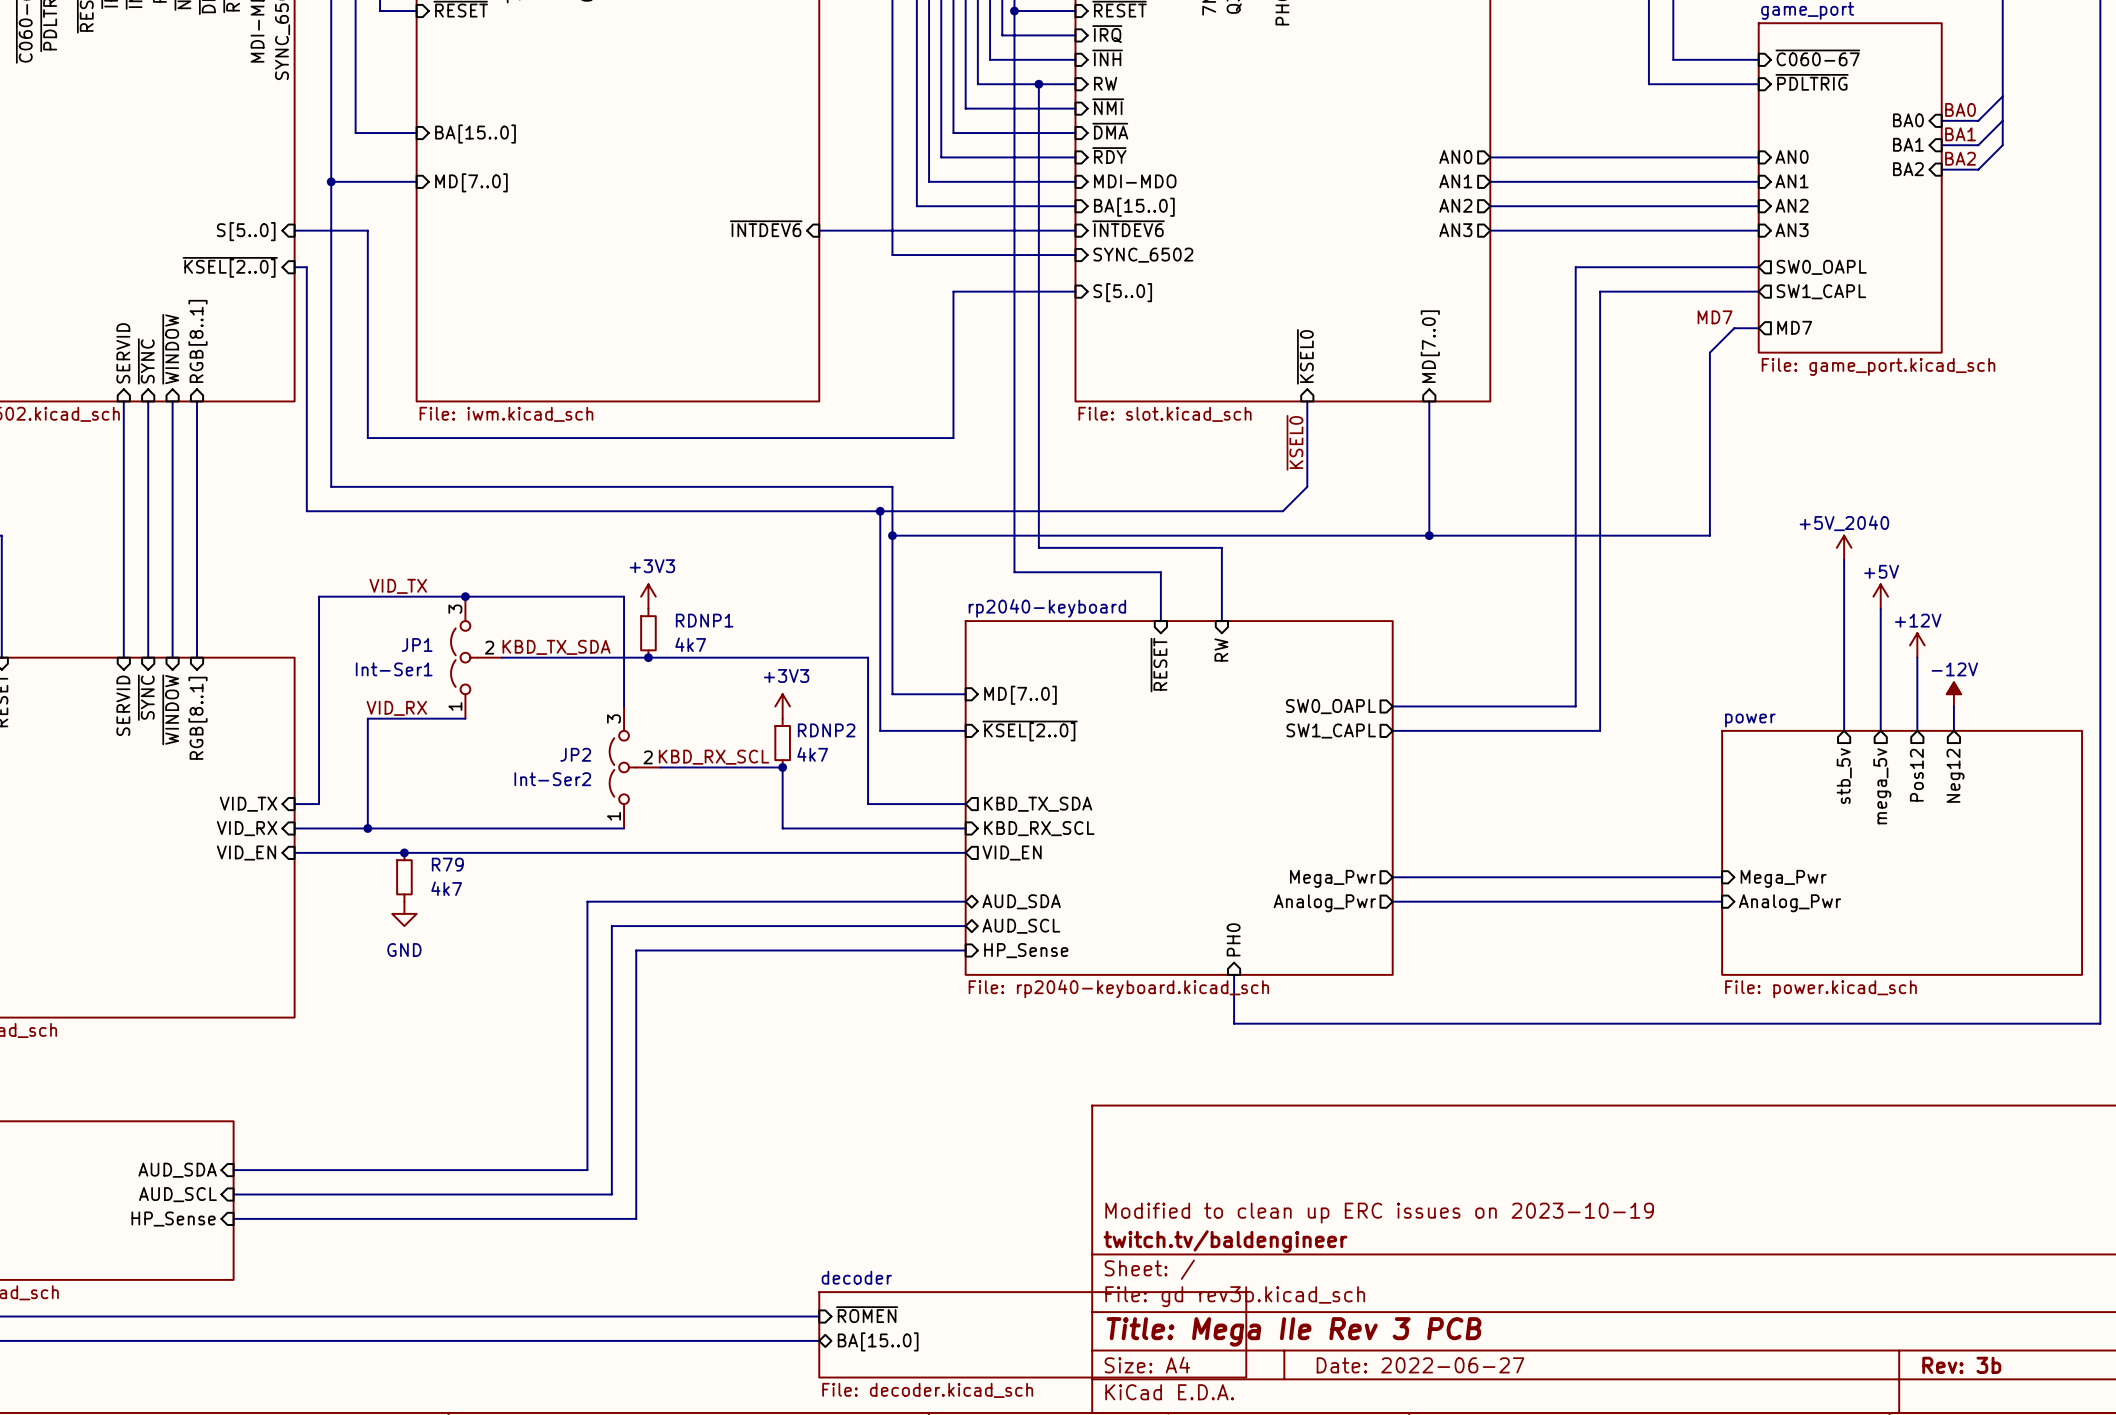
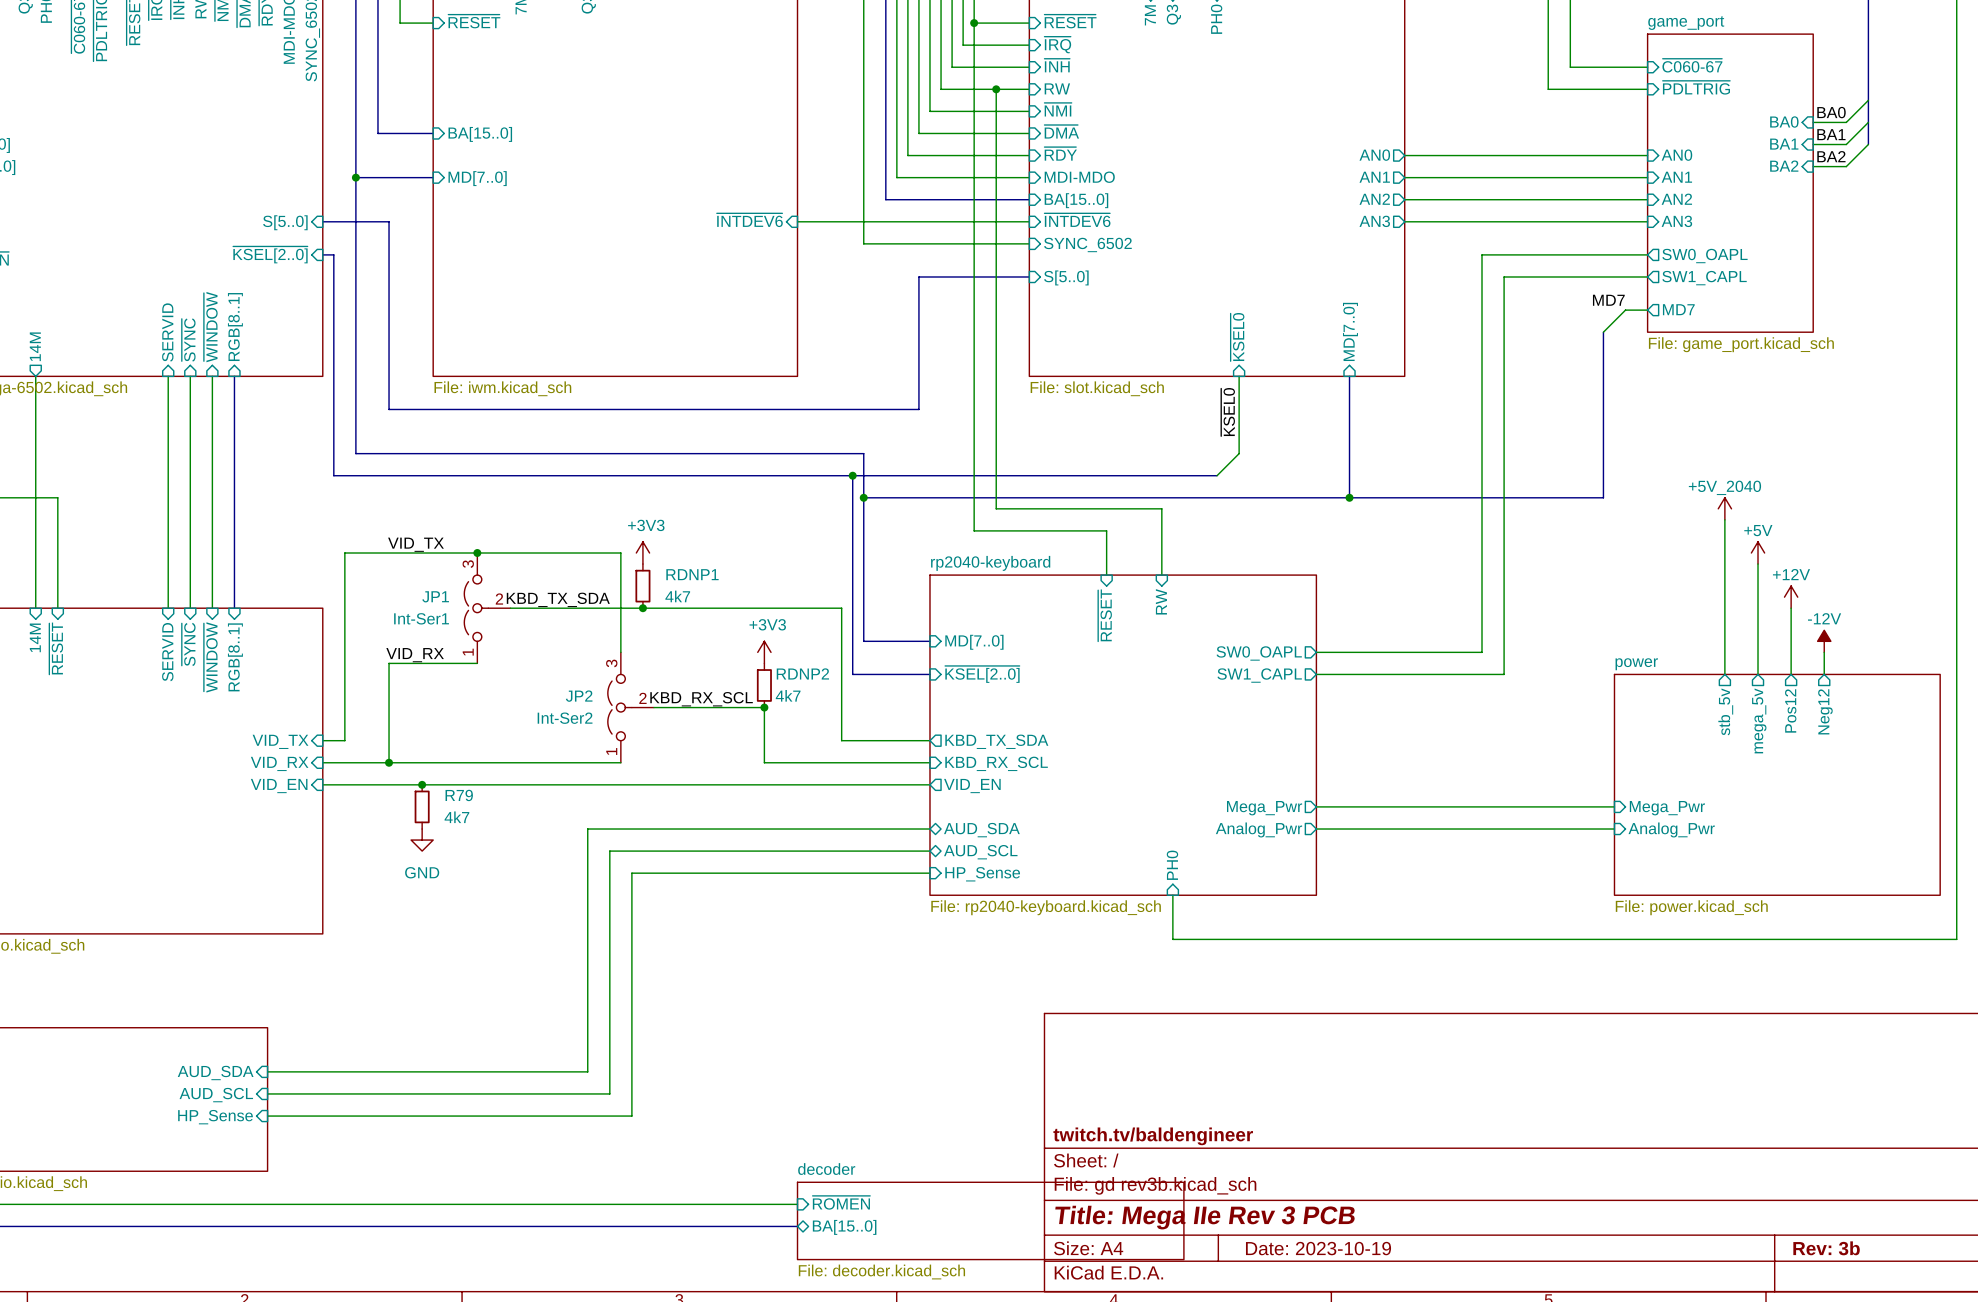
title block: Modified to clean up ERC issues on 2023-10-19 (1379, 1213) -> none
title block: Date: 2022-06-27 (1420, 1365) -> Date: 2023-10-19 (1318, 1248)

